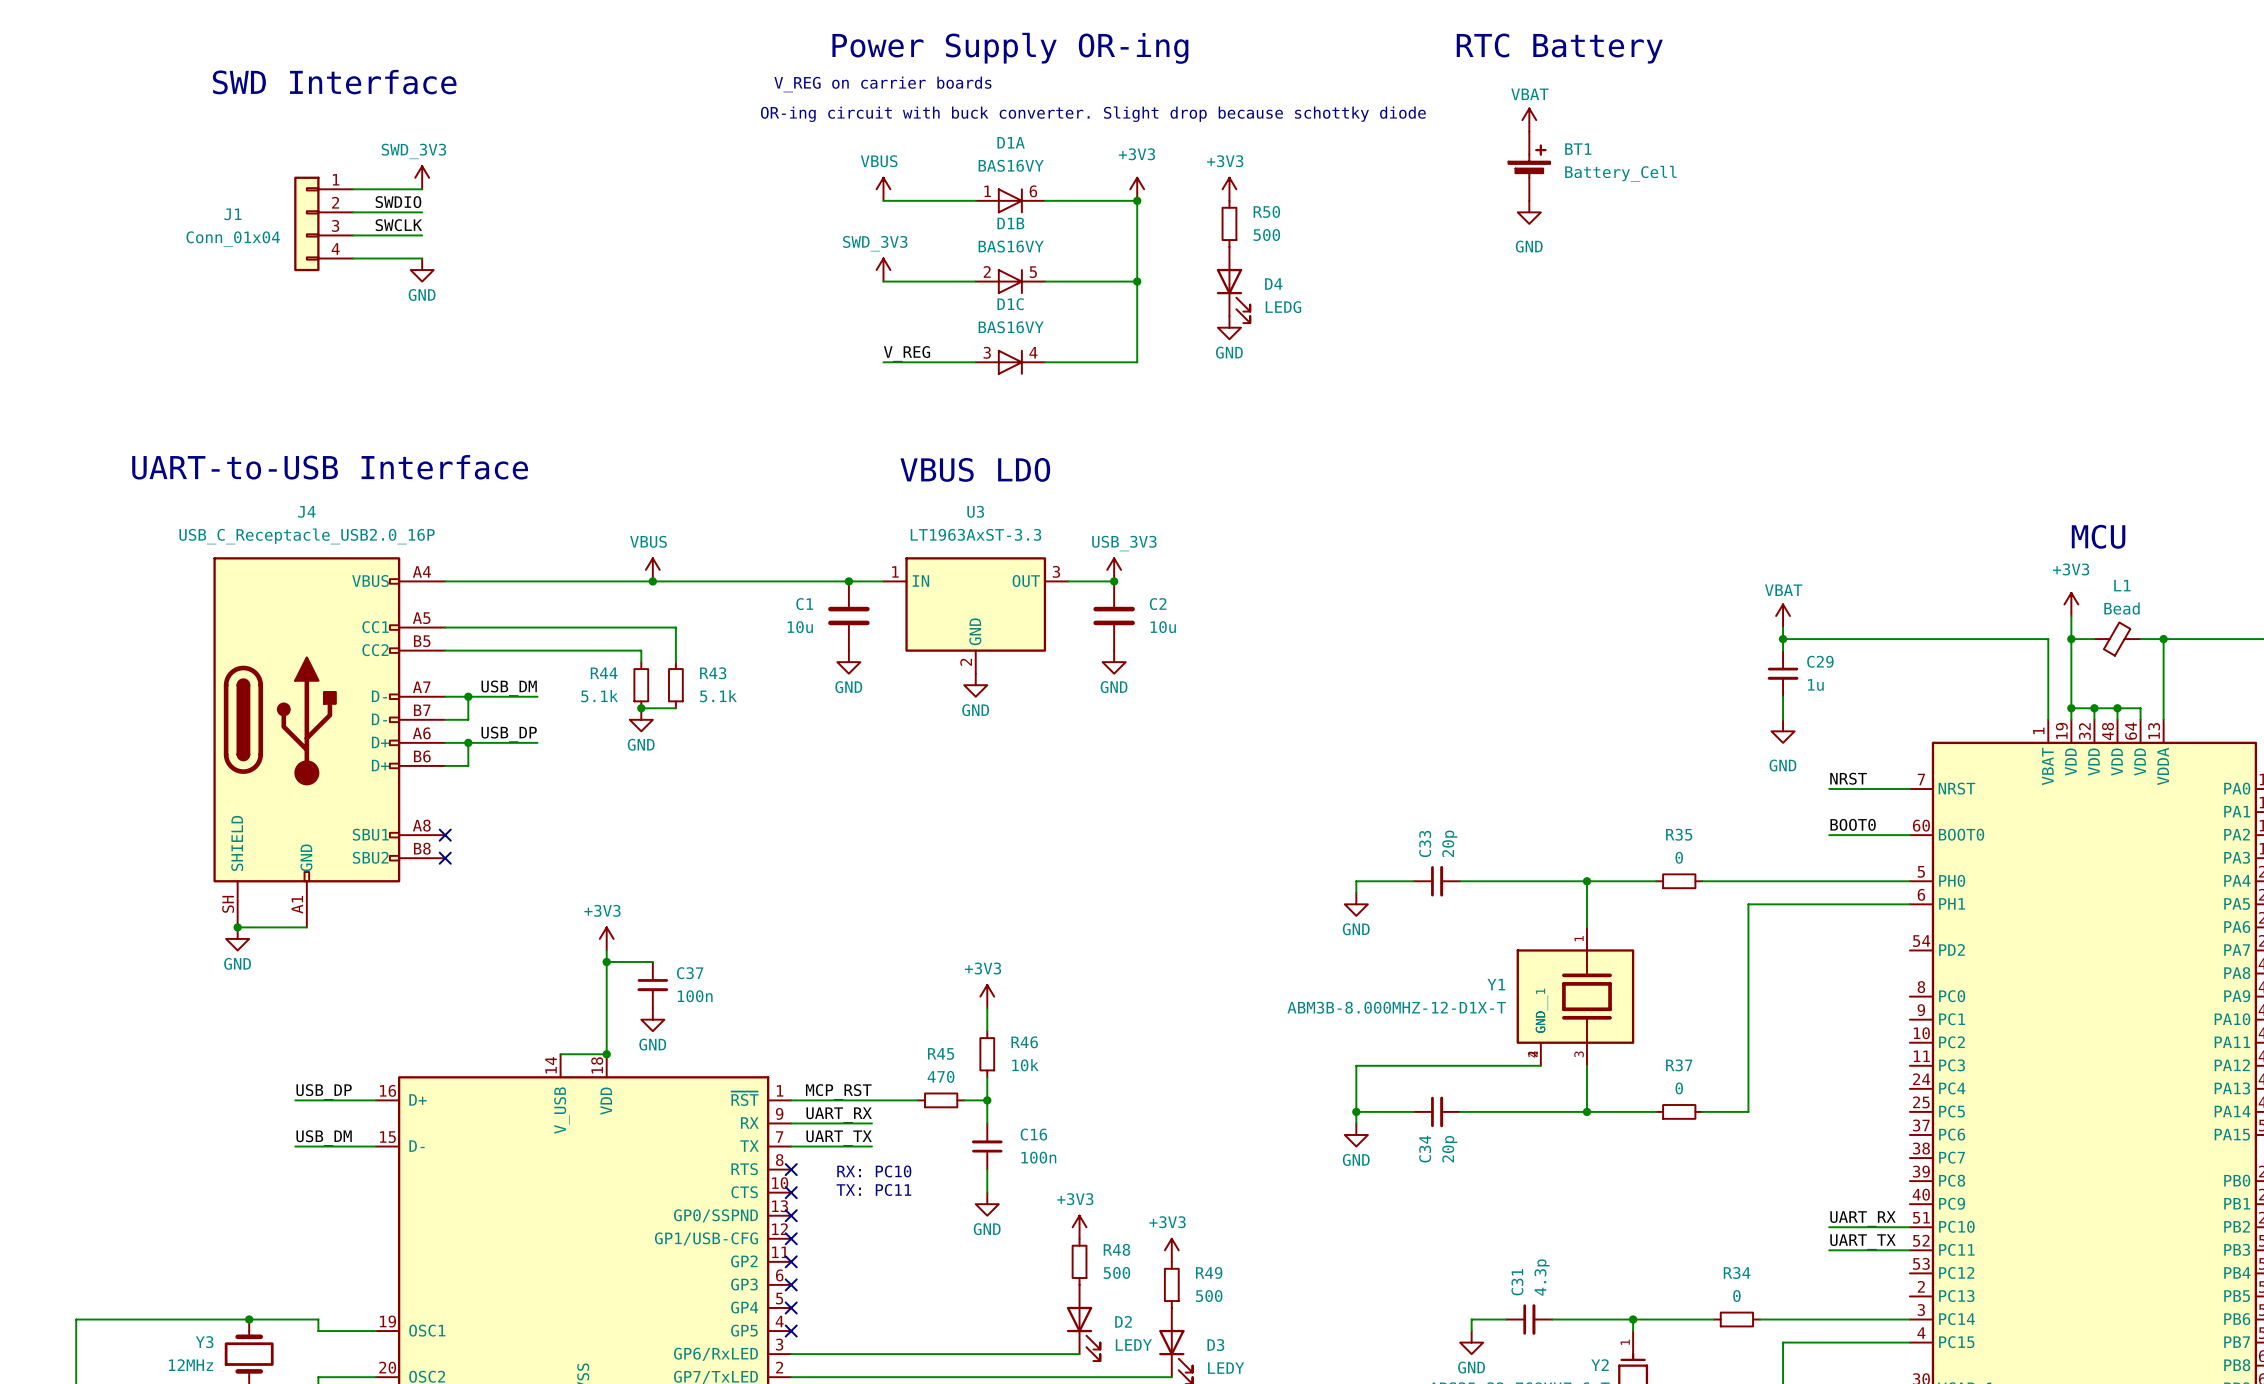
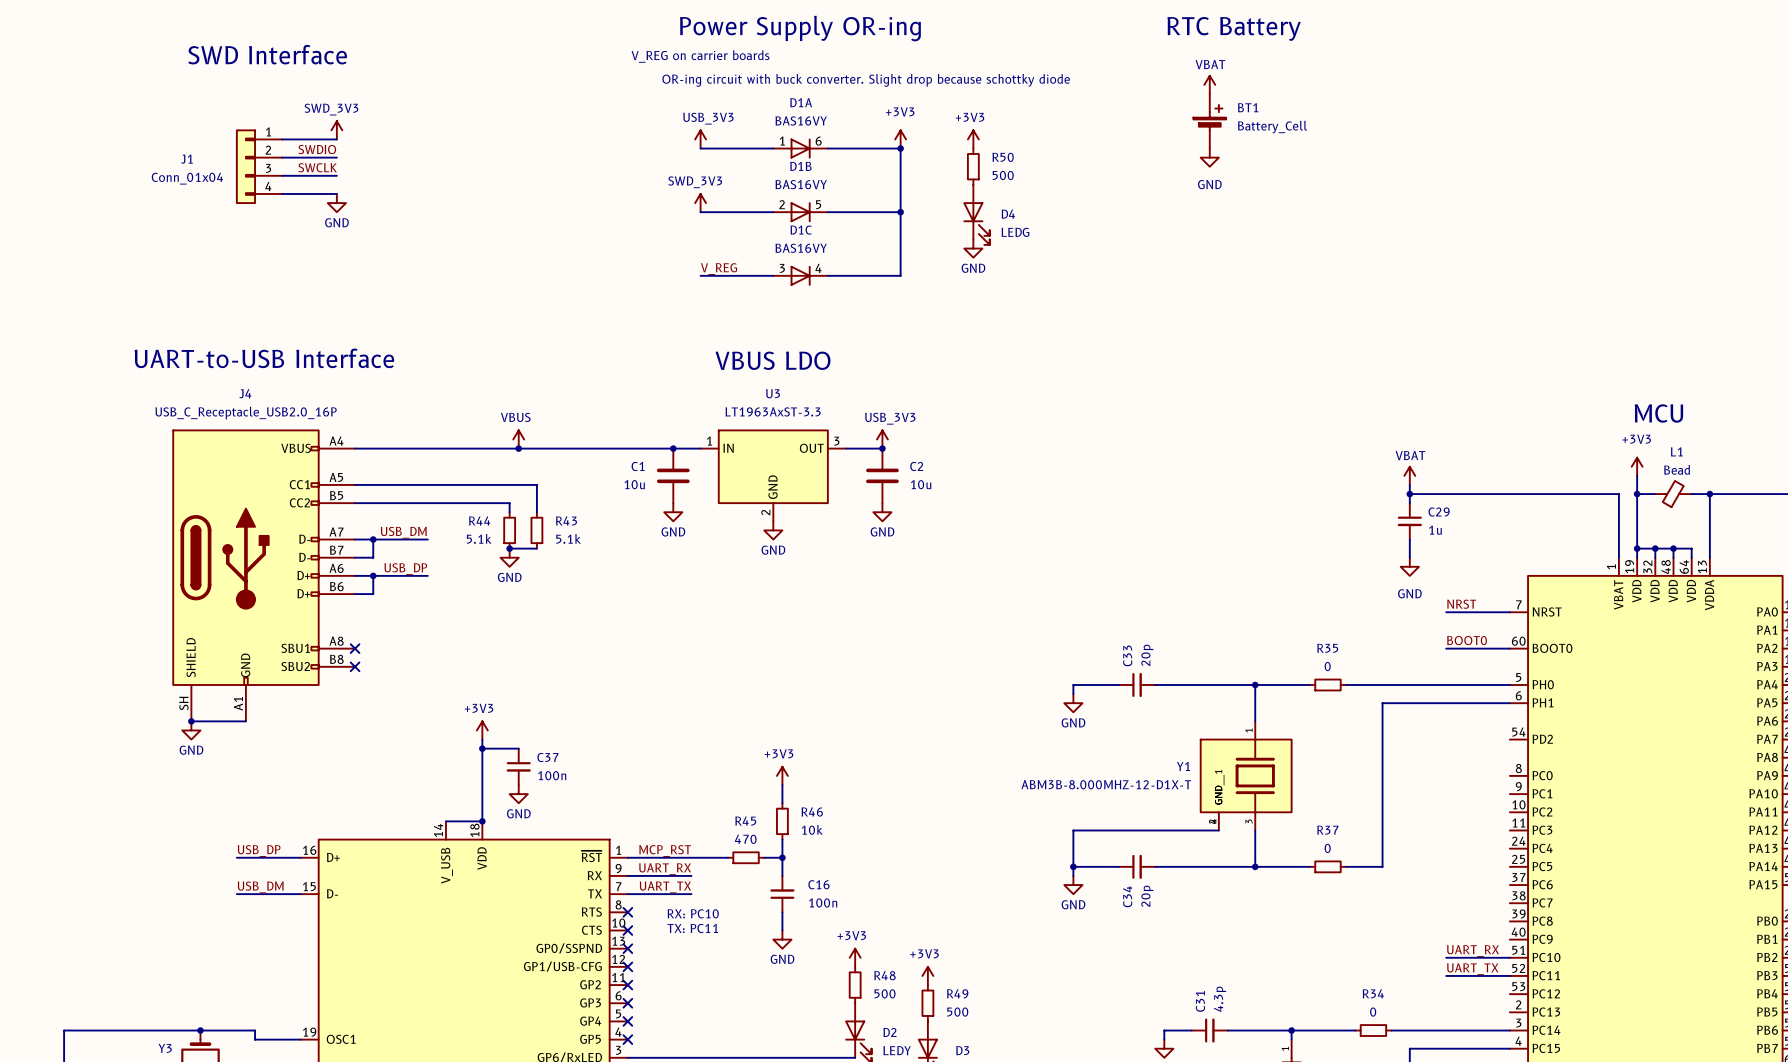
power symbol: VBUS (883, 189) -> USB_3V3 (700, 139)

